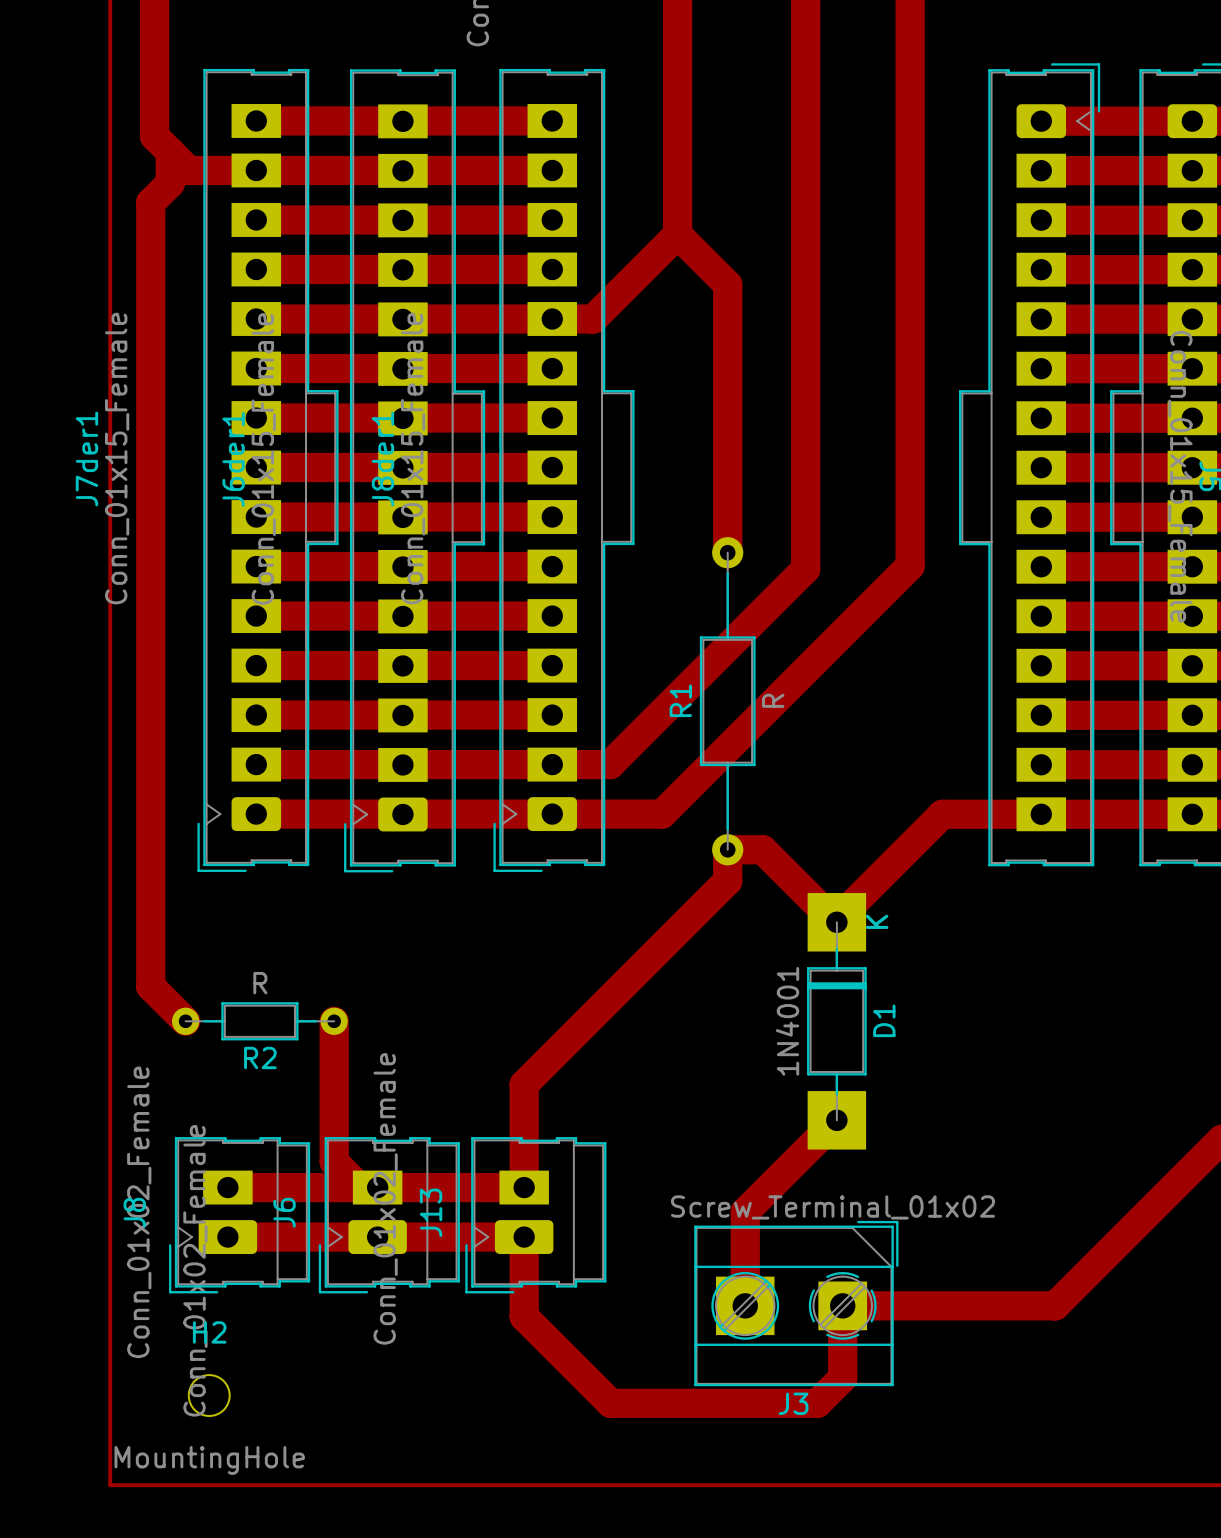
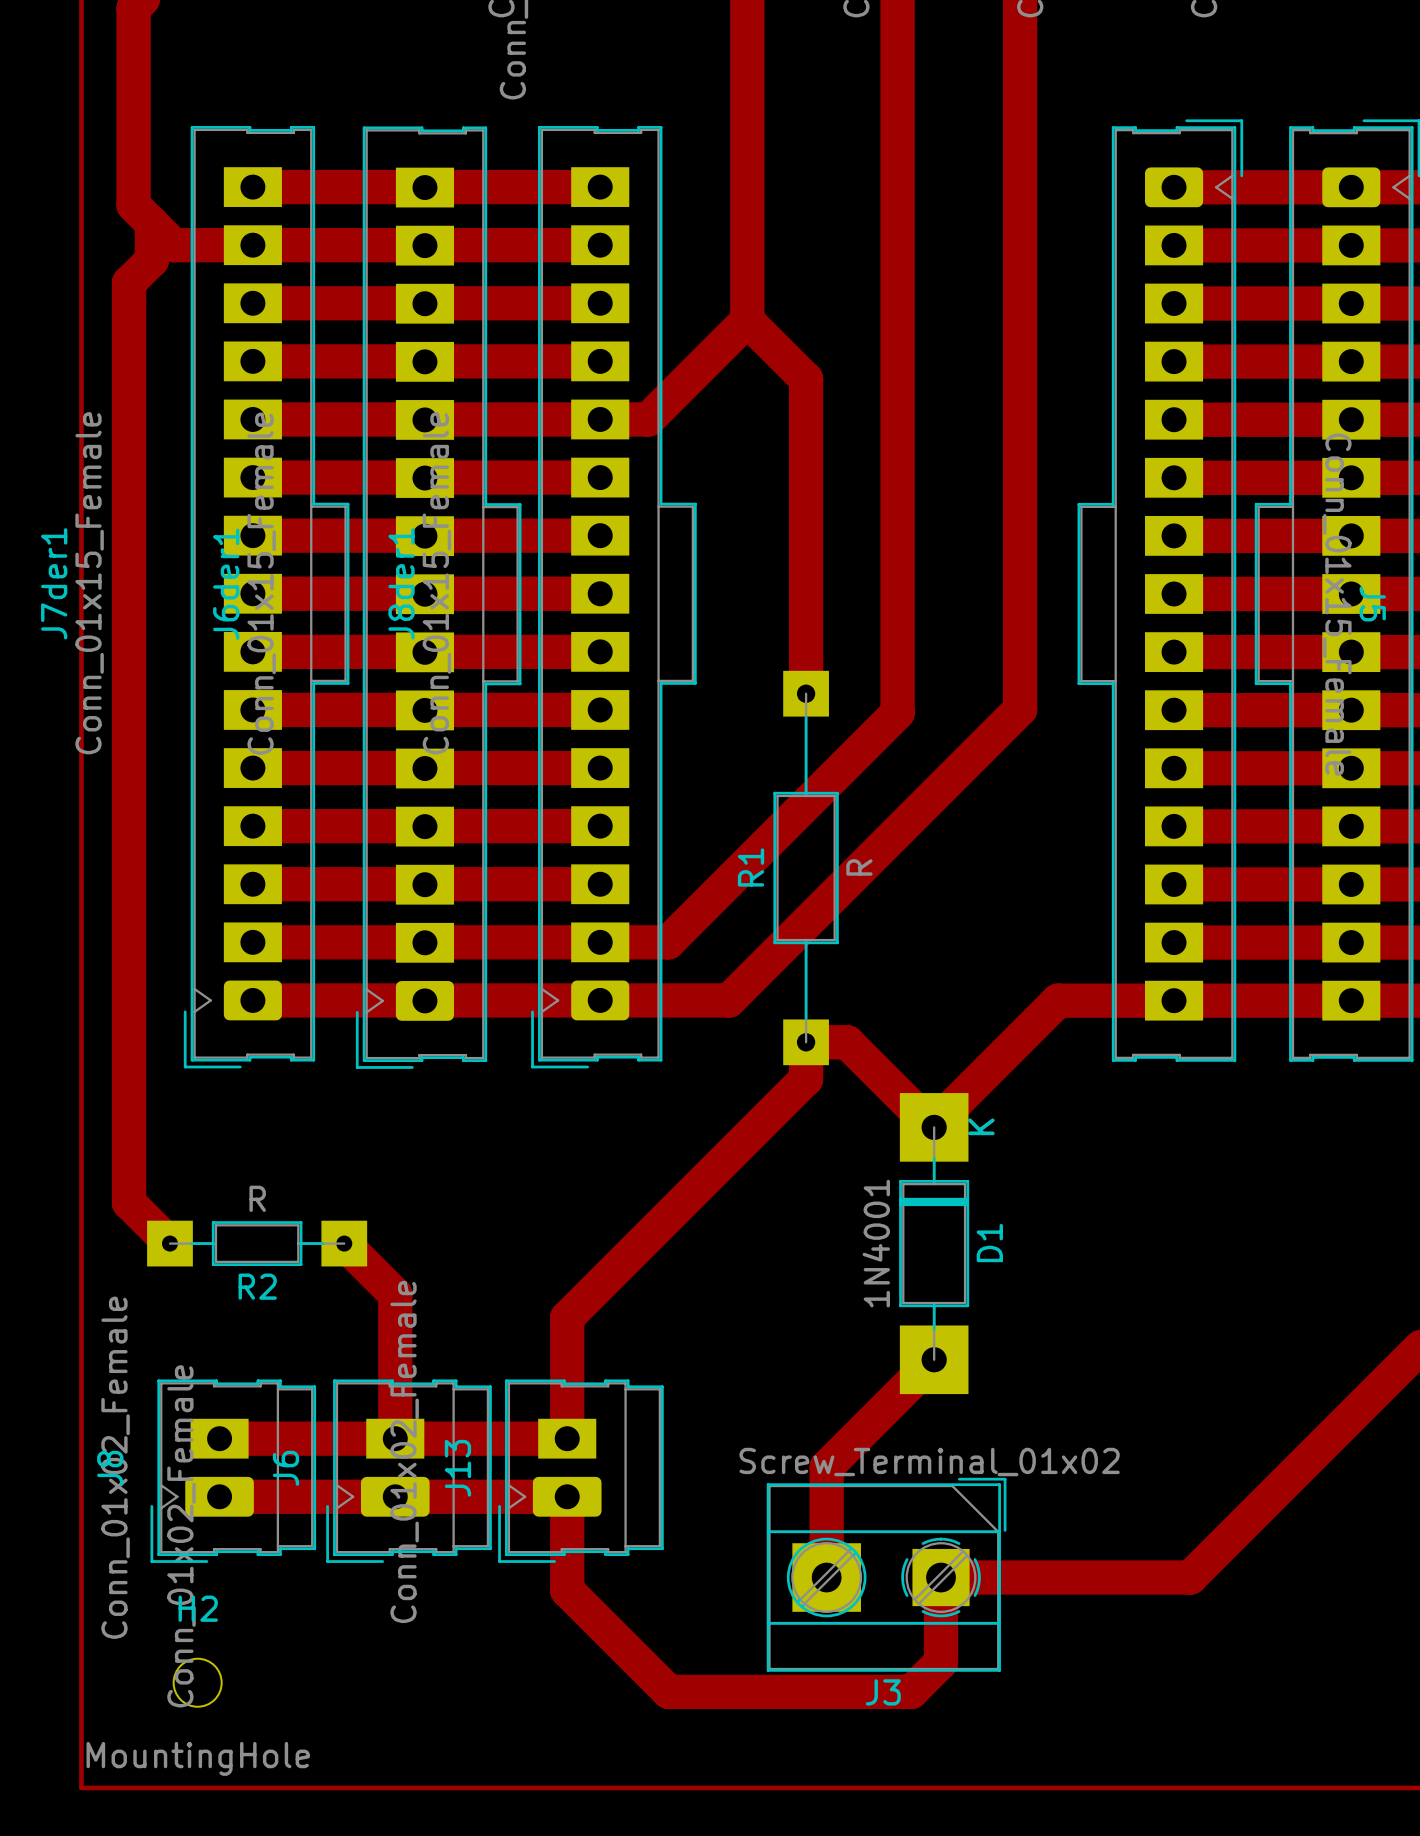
R1 footprint: [699, 537, 756, 866] -> [773, 670, 839, 1066]
R2 footprint: [172, 1002, 348, 1041] -> [147, 1220, 368, 1267]
top track: (334, 1021) (334, 1161) (359, 1187) -> (344, 1243) (395, 1294) (395, 1438)

